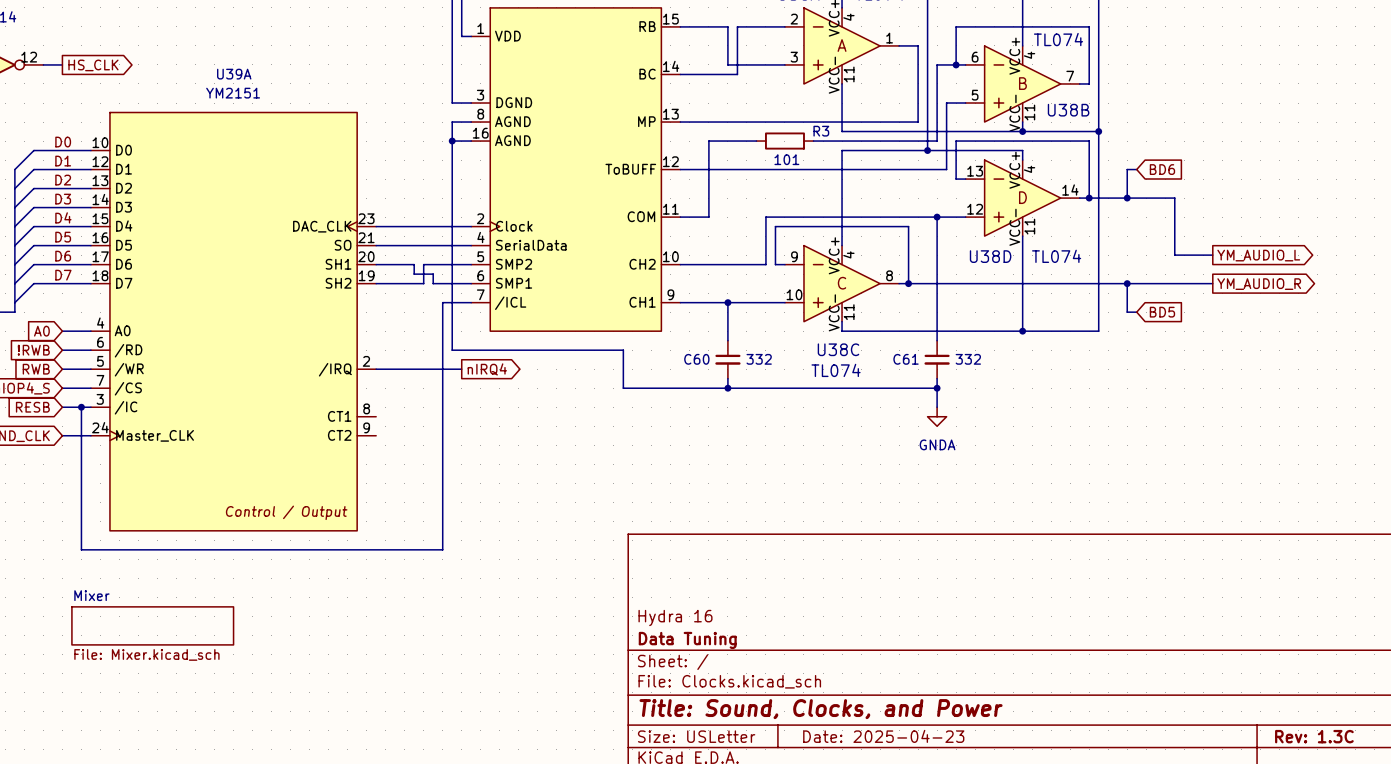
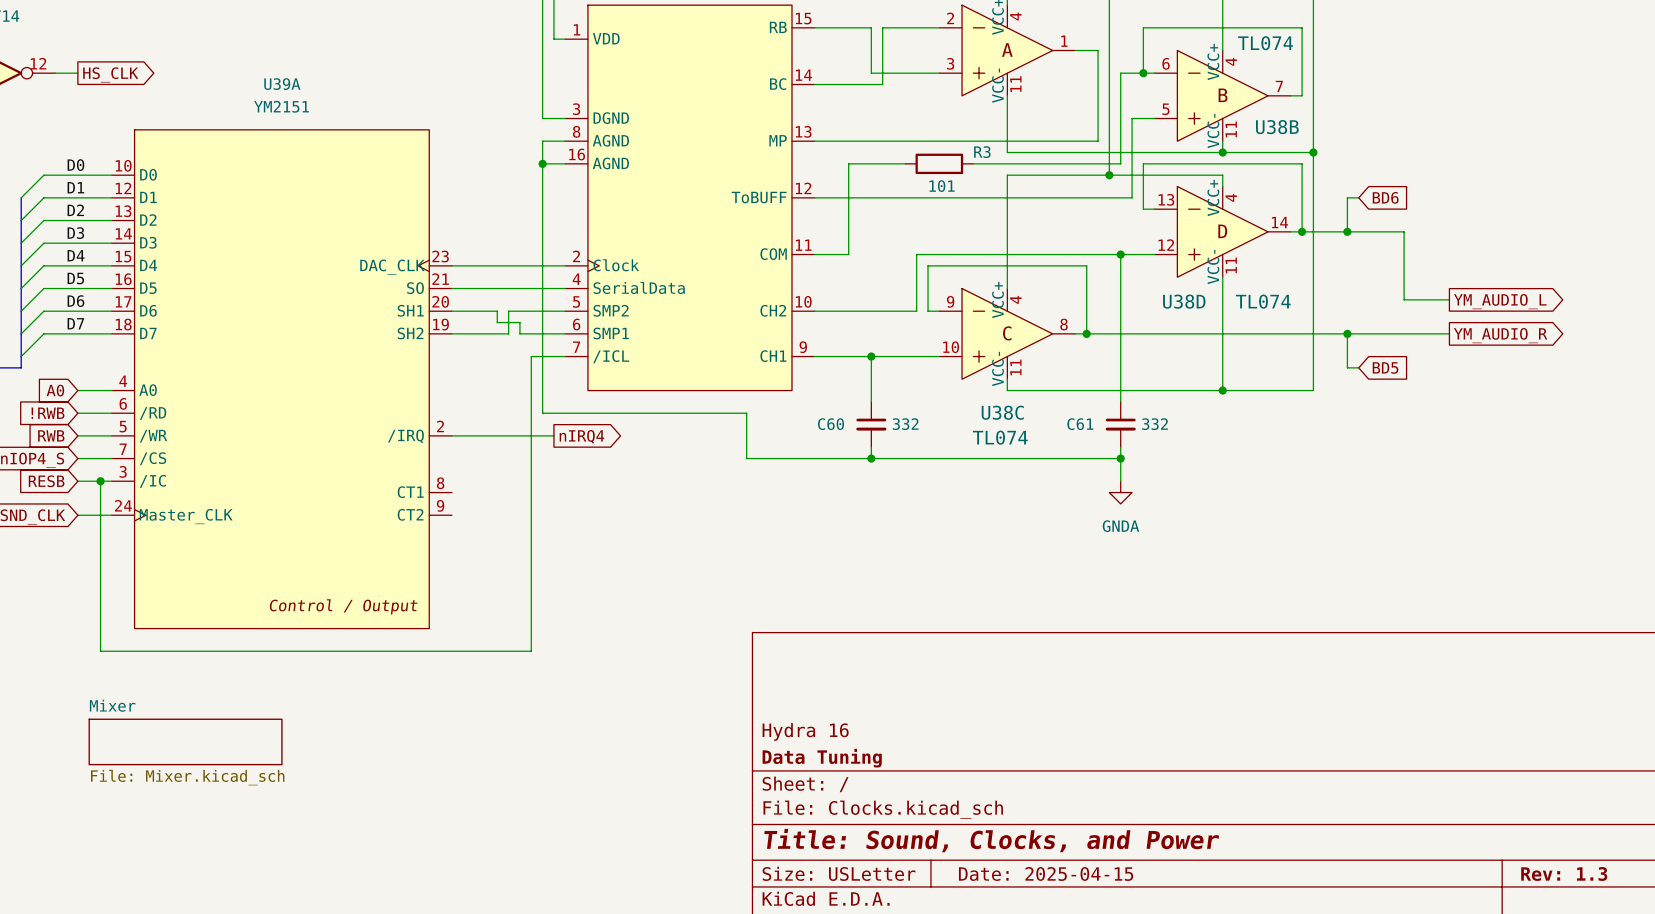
title block: Date: 2025-04-23 (883, 736) -> Date: 2025-04-15 (1046, 873)
title block: Rev: 1.3C (1314, 736) -> Rev: 1.3 (1564, 873)

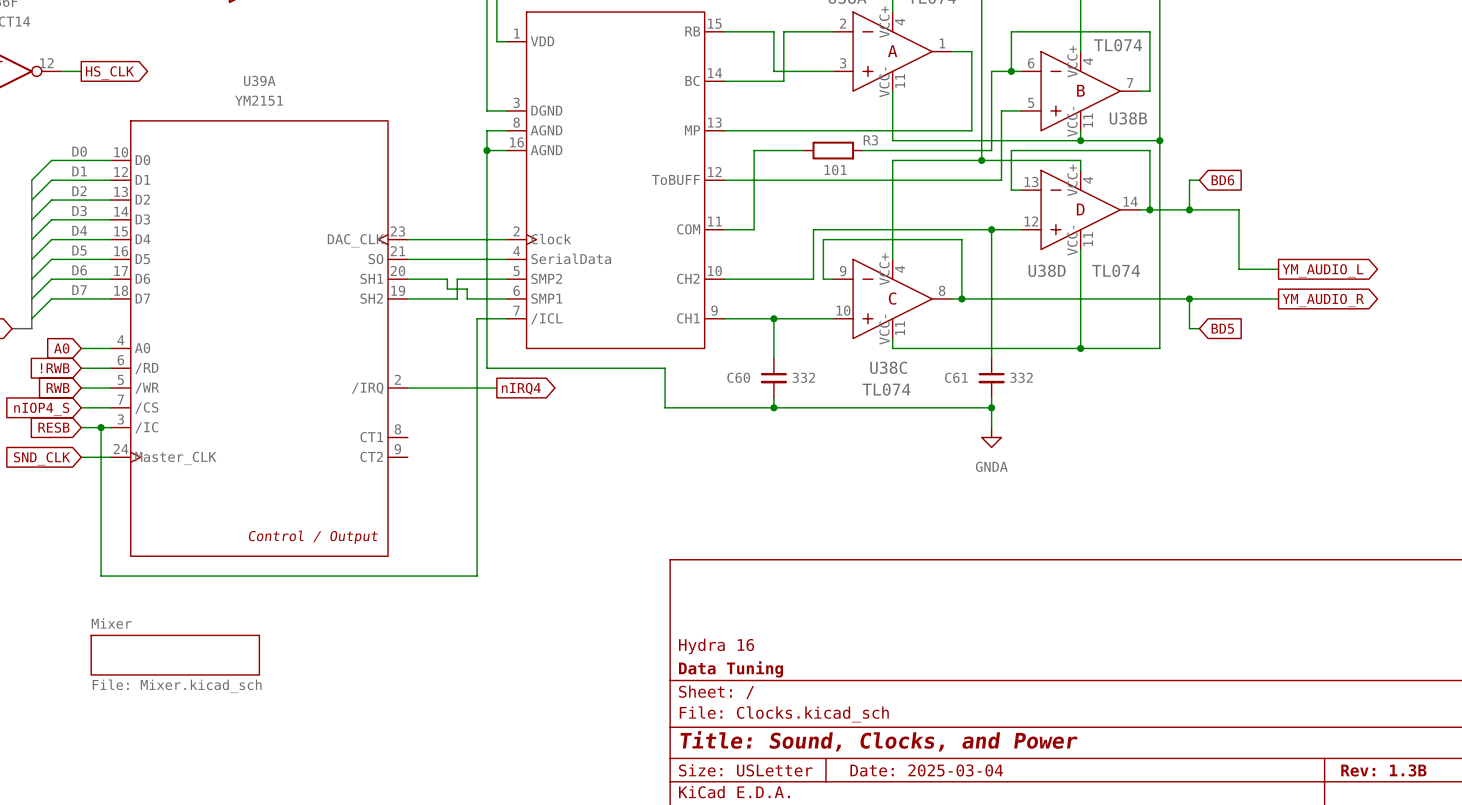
title block: Date: 2025-04-15 (1046, 873) -> Date: 2025-03-04 (926, 770)
title block: Rev: 1.3 (1564, 873) -> Rev: 1.3B (1383, 770)

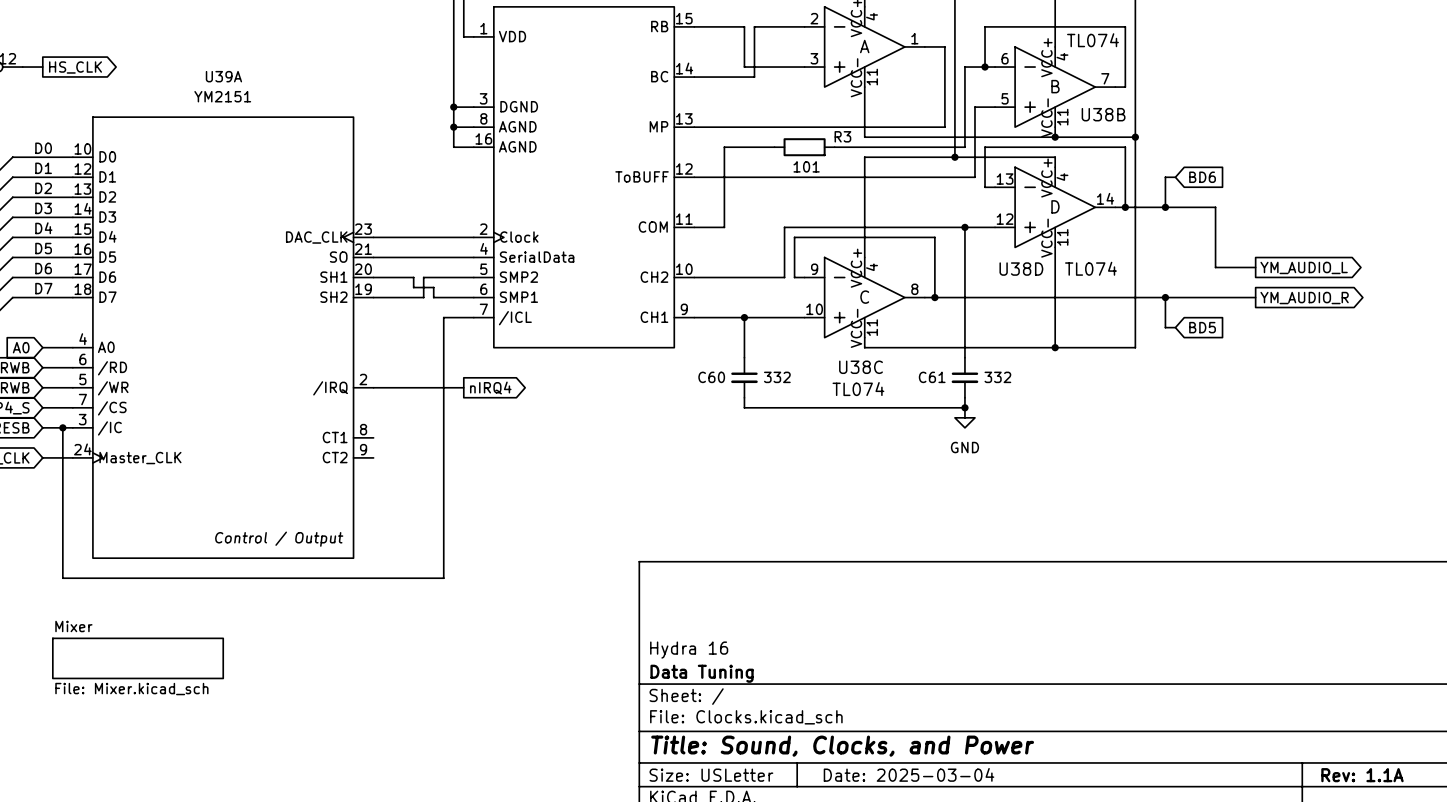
wire: none -> (453, 107) (453, 127)
junction: none -> (453, 107)
junction: none -> (453, 127)
wire: (486, 150) (486, 368) (665, 368) (665, 407) (773, 407) -> none
junction: (486, 150) -> none
junction: (773, 407) -> none
power symbol: none -> GND (964, 417)
power symbol: GNDA (991, 437) -> none
title block: Rev: 1.3B (1383, 770) -> Rev: 1.1A (1362, 775)

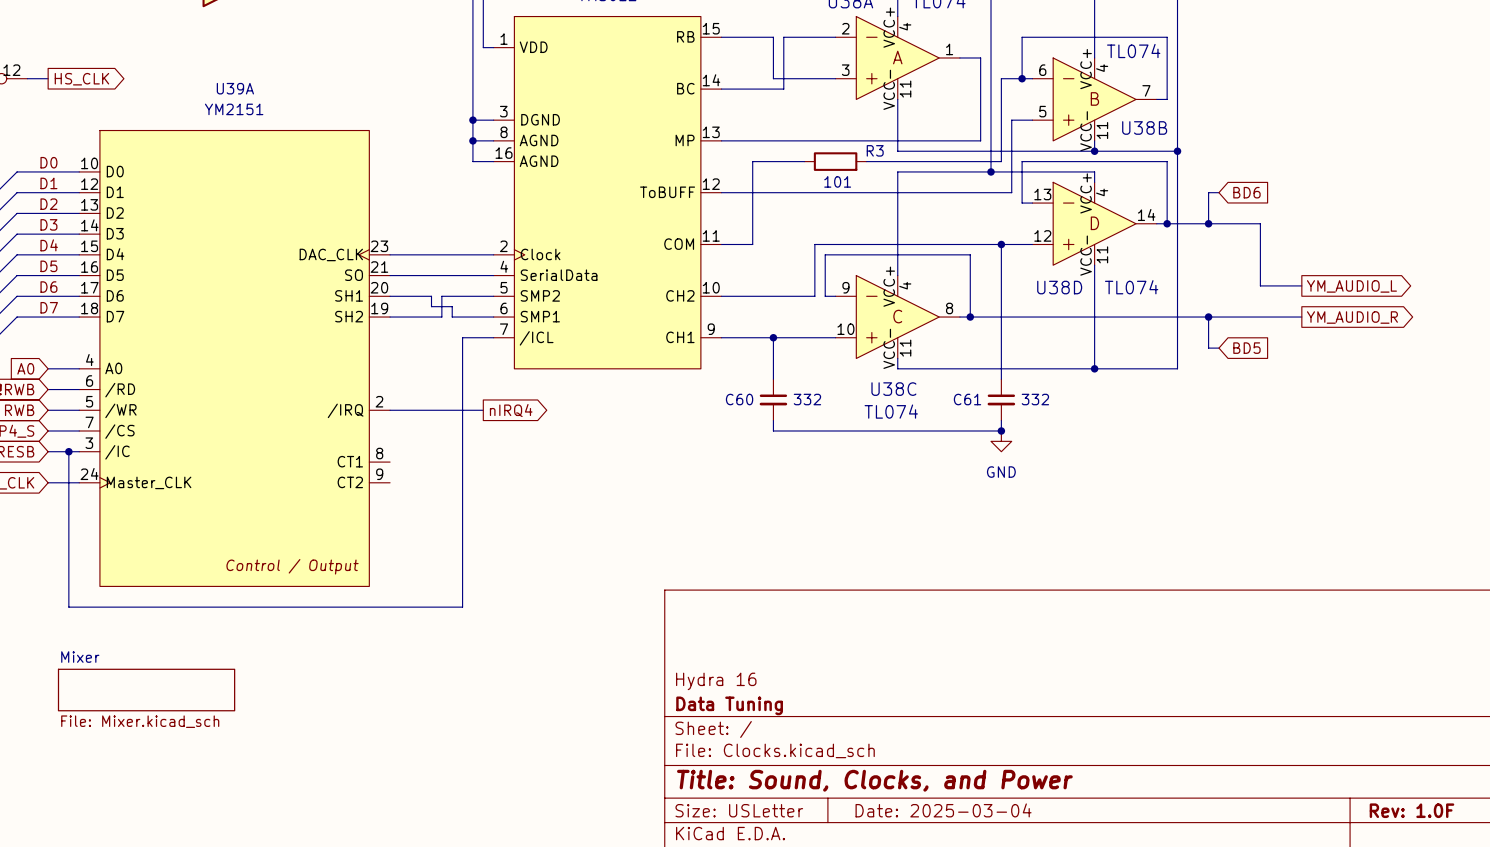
title block: Rev: 1.1A (1362, 775) -> Rev: 1.0F (1411, 810)

